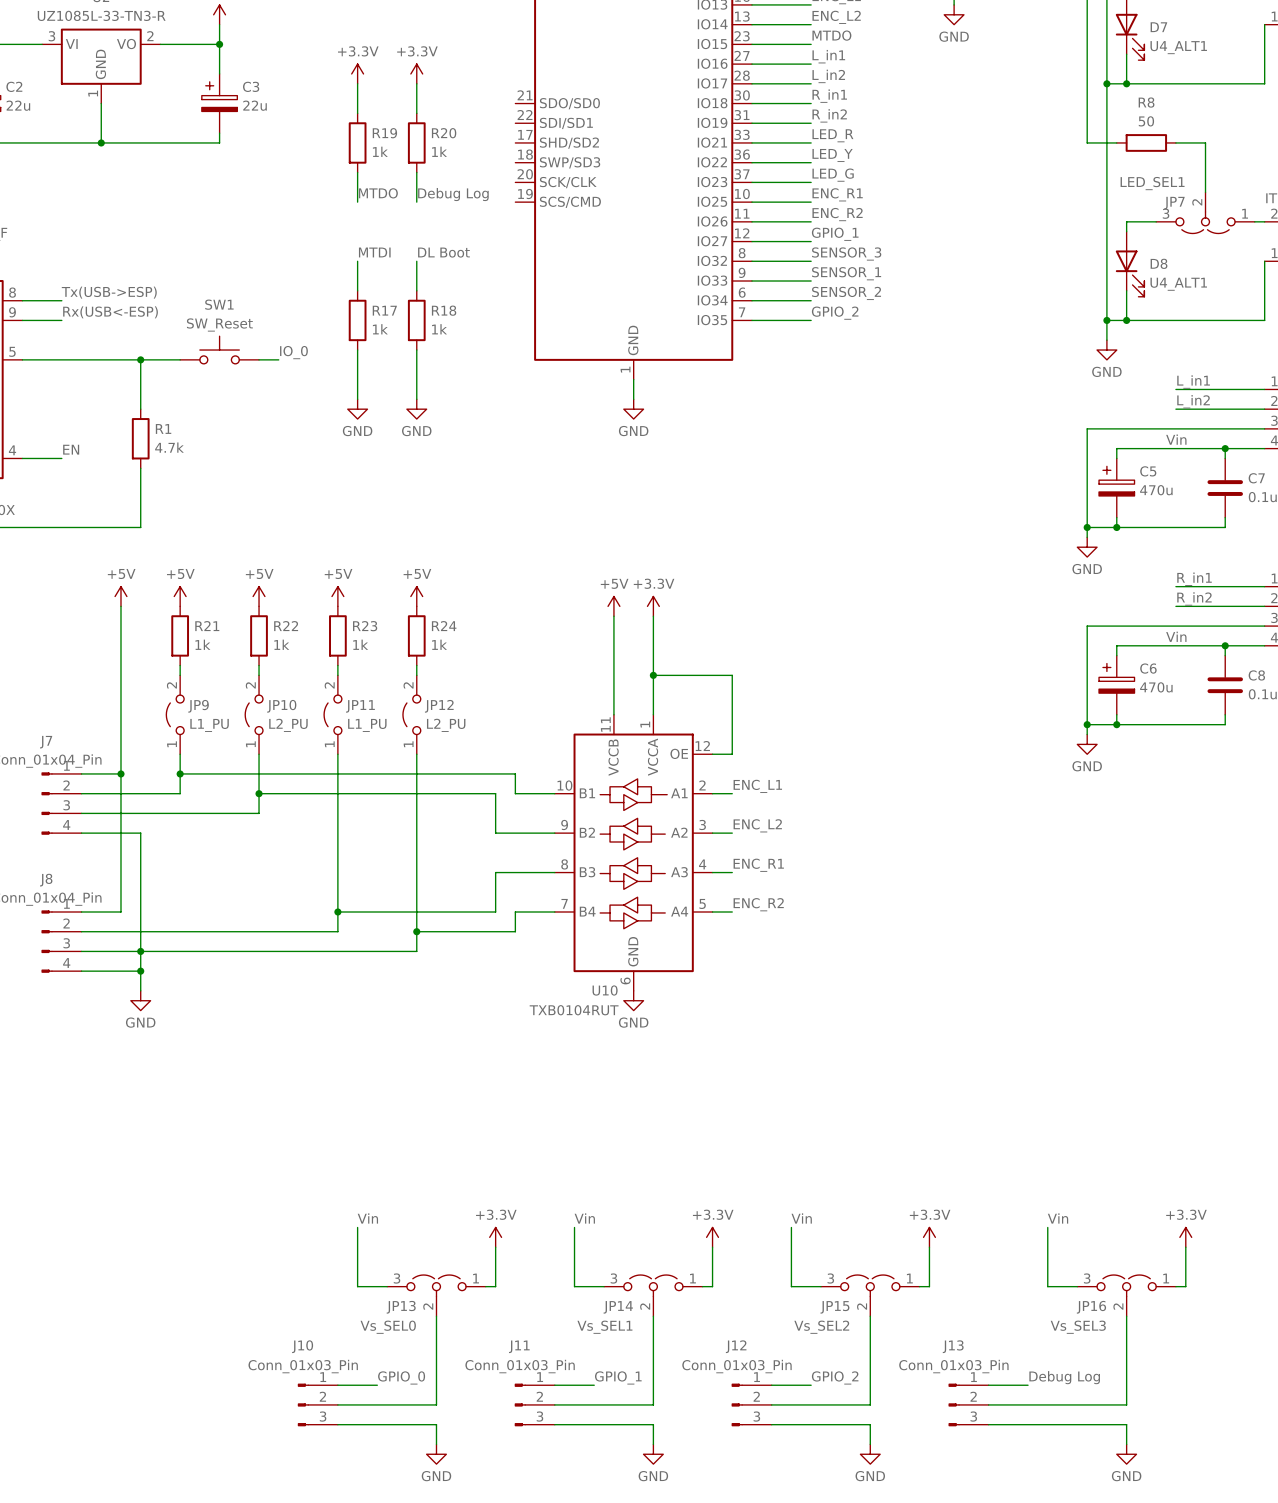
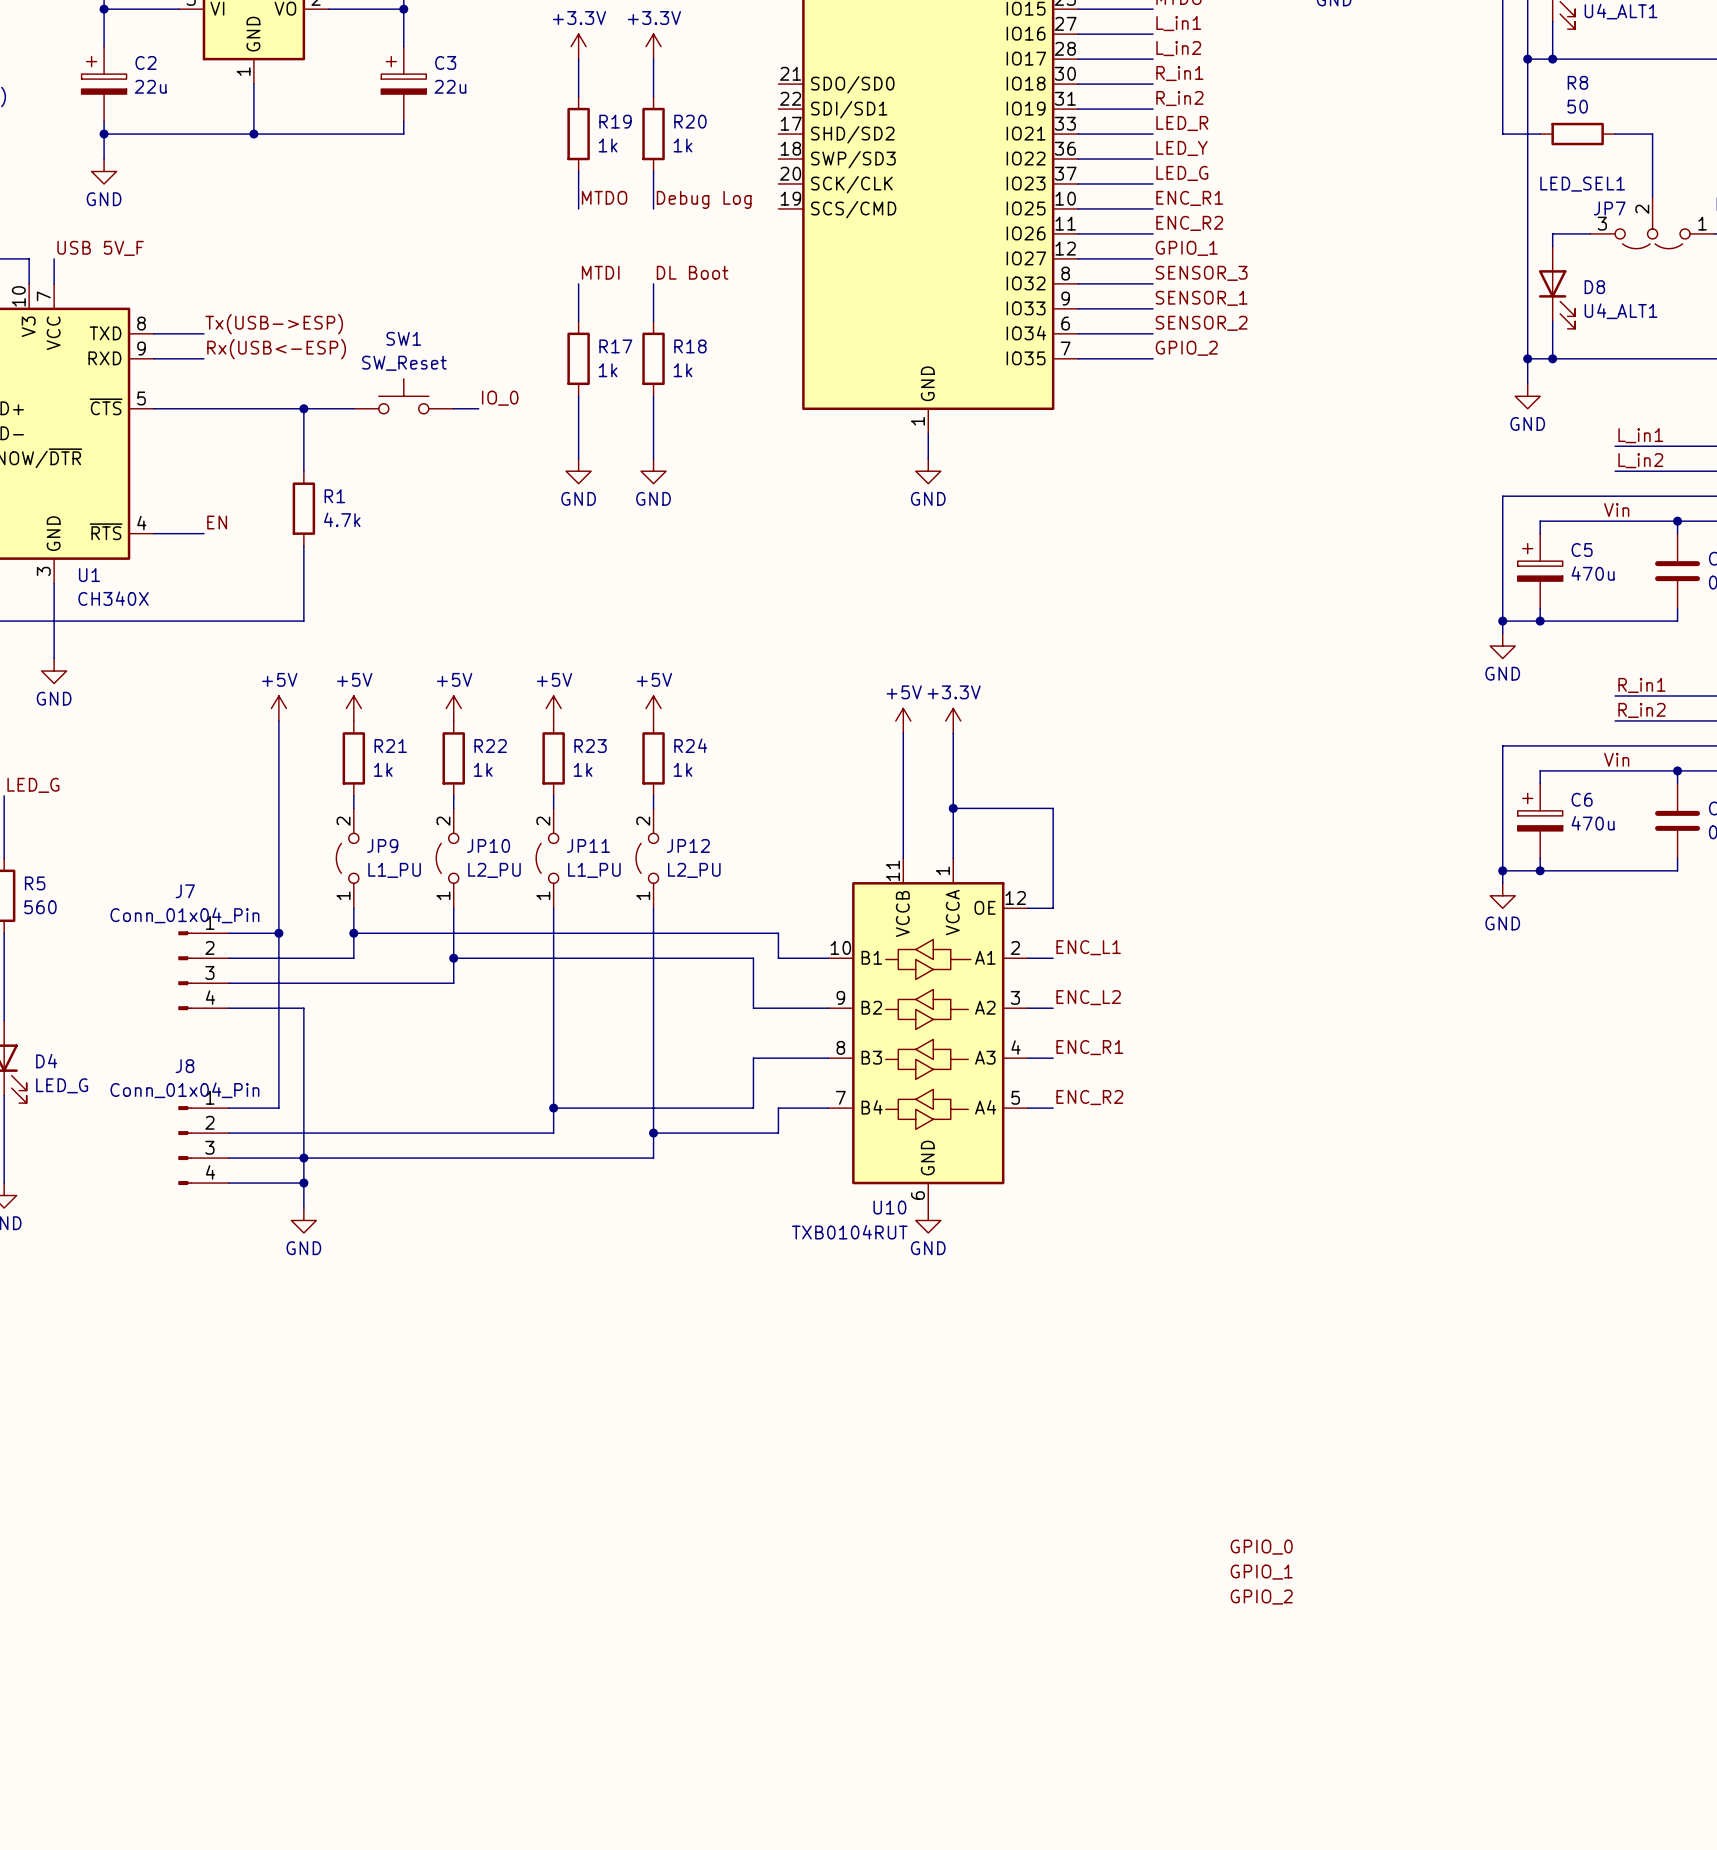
label: Vin (367, 1218) -> none
label: Vin (584, 1218) -> none
label: Vin (801, 1218) -> none
label: Vin (1058, 1218) -> none
wire: (357, 1227) (357, 1286) (387, 1286) -> none
wire: (574, 1227) (574, 1286) (604, 1286) -> none
wire: (791, 1227) (791, 1286) (821, 1286) -> none
wire: (1047, 1227) (1047, 1286) (1077, 1286) -> none
power symbol: +3.3V (495, 1237) -> none
power symbol: +3.3V (712, 1237) -> none
power symbol: +3.3V (929, 1237) -> none
power symbol: +3.3V (1185, 1237) -> none
wire: (495, 1247) (495, 1286) (485, 1286) -> none
wire: (712, 1247) (712, 1286) (702, 1286) -> none
wire: (929, 1247) (929, 1286) (919, 1286) -> none
wire: (1185, 1247) (1185, 1286) (1175, 1286) -> none
label: none -> GPIO_0 (1261, 1547)
label: none -> GPIO_1 (1261, 1572)
JP13: Vs_SEL0 (436, 1295) -> none
JP14: Vs_SEL1 (653, 1295) -> none
JP15: Vs_SEL2 (870, 1295) -> none
JP16: Vs_SEL3 (1126, 1295) -> none
wire: (436, 1316) (436, 1404) (337, 1404) -> none
wire: (653, 1316) (653, 1404) (554, 1404) -> none
wire: (870, 1316) (870, 1404) (771, 1404) -> none
wire: (1126, 1316) (1126, 1404) (988, 1404) -> none
label: GPIO_0 (401, 1377) -> none
label: GPIO_1 (618, 1377) -> none
label position: GPIO_2 (835, 1377) -> GPIO_2 (1261, 1597)
label: Debug Log (1064, 1377) -> none
wire: (337, 1385) (377, 1385) -> none
wire: (554, 1385) (594, 1385) -> none
wire: (771, 1385) (811, 1385) -> none
wire: (988, 1385) (1028, 1385) -> none
J10: Conn_01x03_Pin (317, 1404) -> none
J11: Conn_01x03_Pin (534, 1404) -> none
J12: Conn_01x03_Pin (751, 1404) -> none
J13: Conn_01x03_Pin (968, 1404) -> none
wire: (337, 1424) (436, 1424) (436, 1444) -> none
wire: (554, 1424) (653, 1424) (653, 1444) -> none
wire: (771, 1424) (870, 1424) (870, 1444) -> none
wire: (988, 1424) (1126, 1424) (1126, 1444) -> none
power symbol: GND (436, 1454) -> none
power symbol: GND (653, 1454) -> none
power symbol: GND (870, 1454) -> none
power symbol: GND (1126, 1454) -> none

